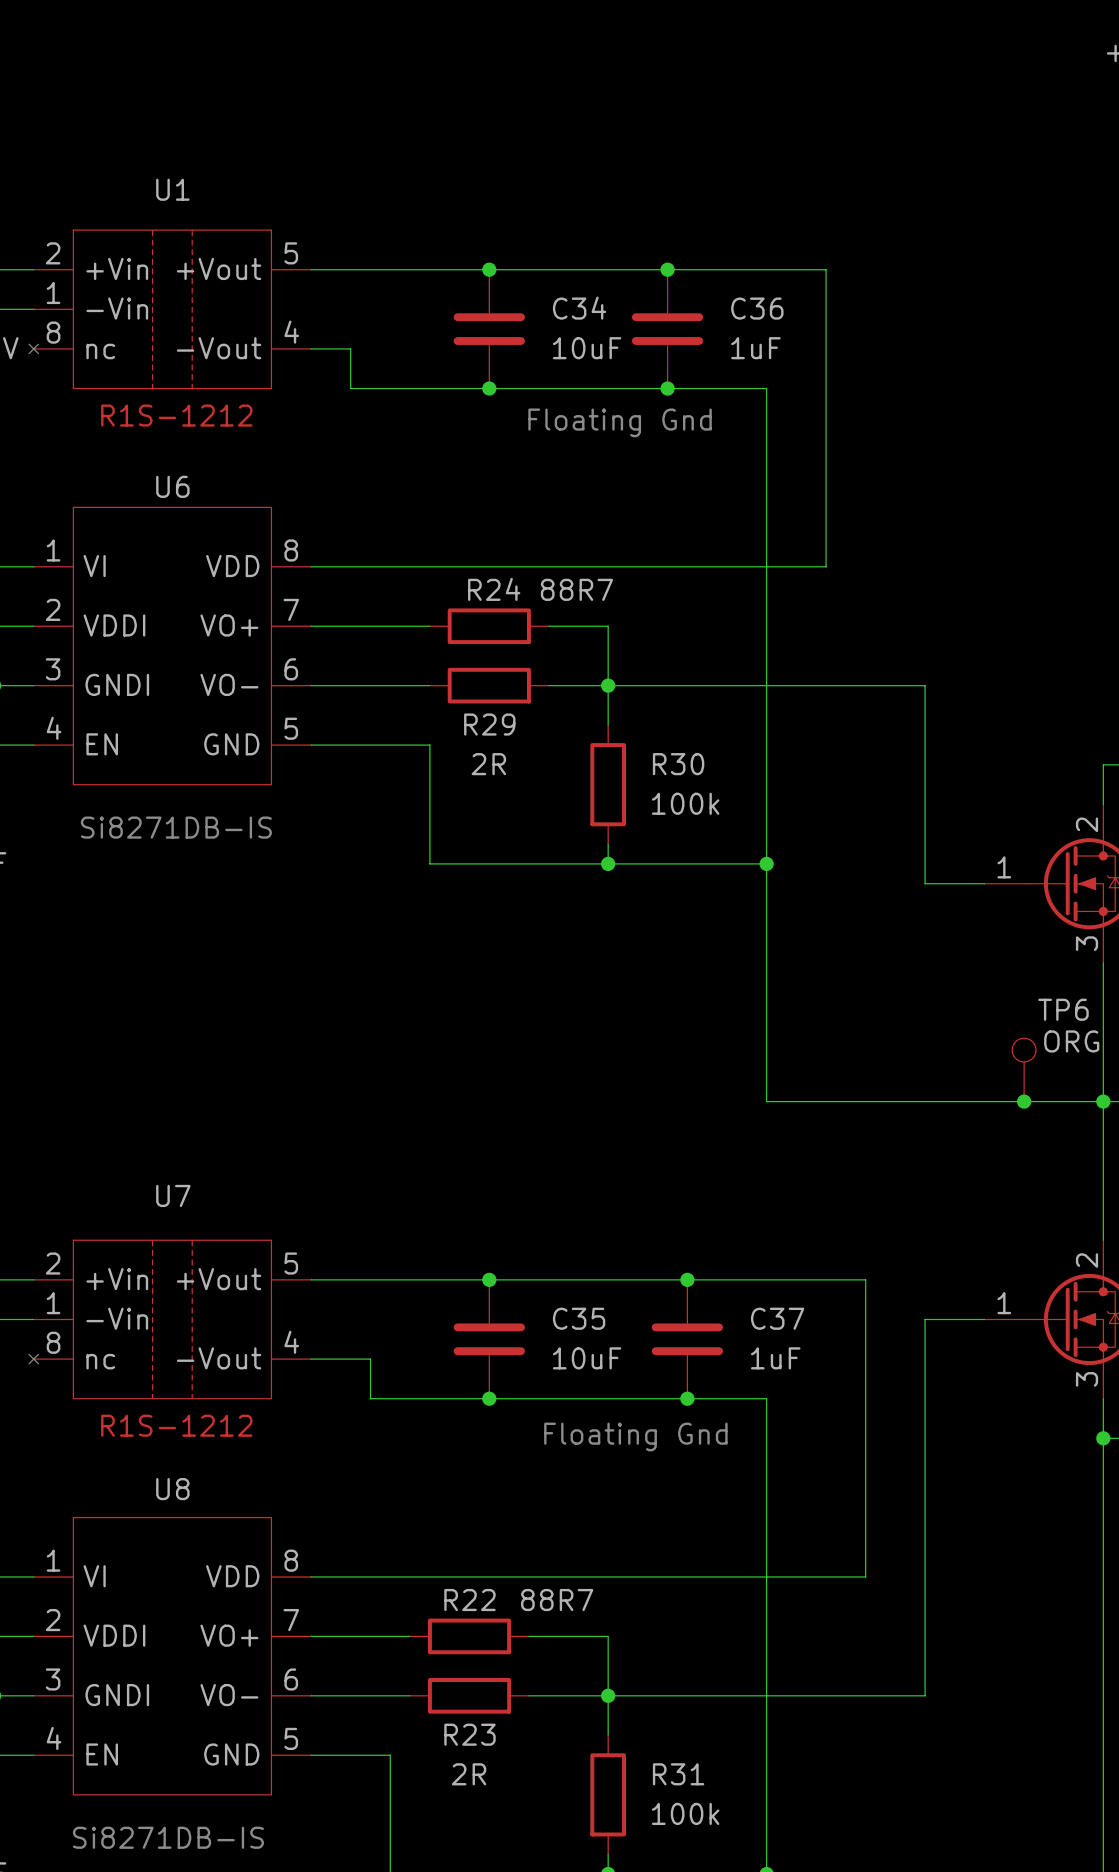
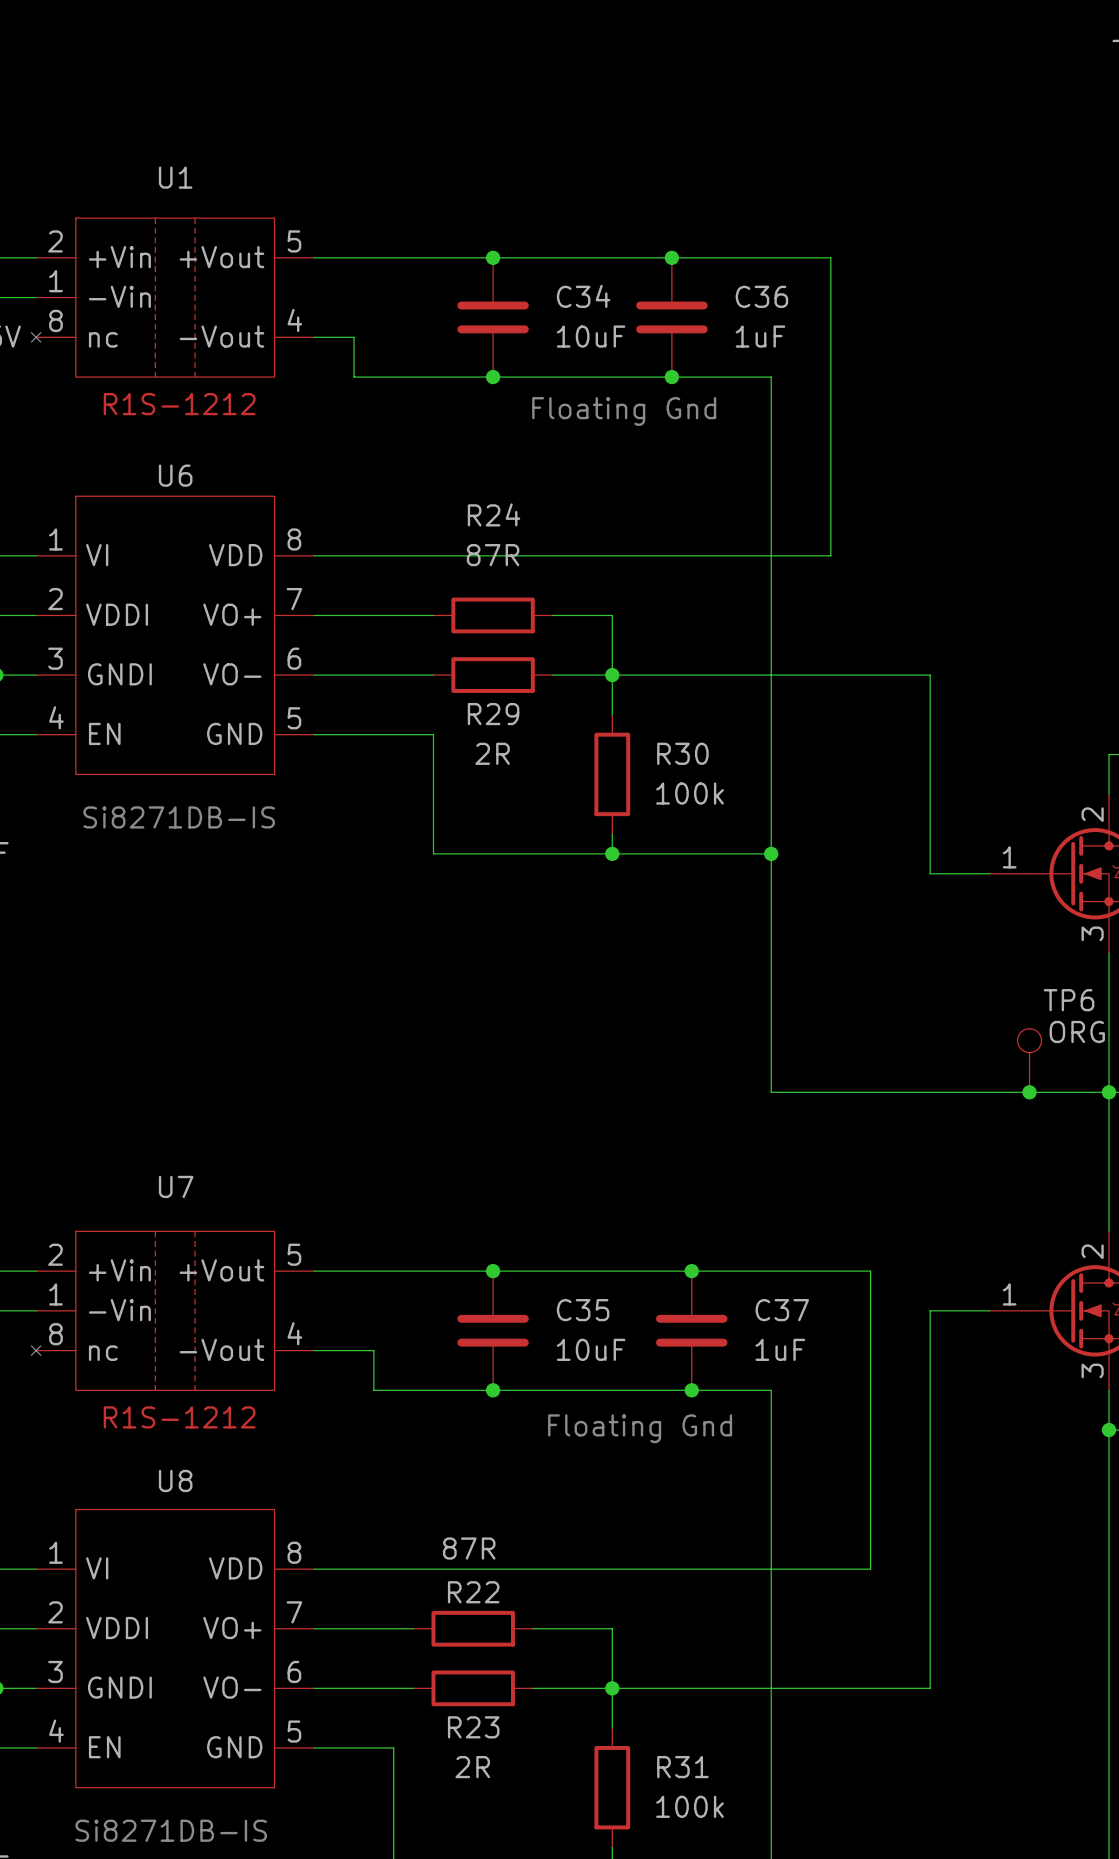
R24 name position: R24 (494, 589) -> R24 (494, 514)
R24 value: 88R7 (576, 589) -> 87R (493, 555)
R22 value: 88R7 (557, 1600) -> 87R (469, 1548)

